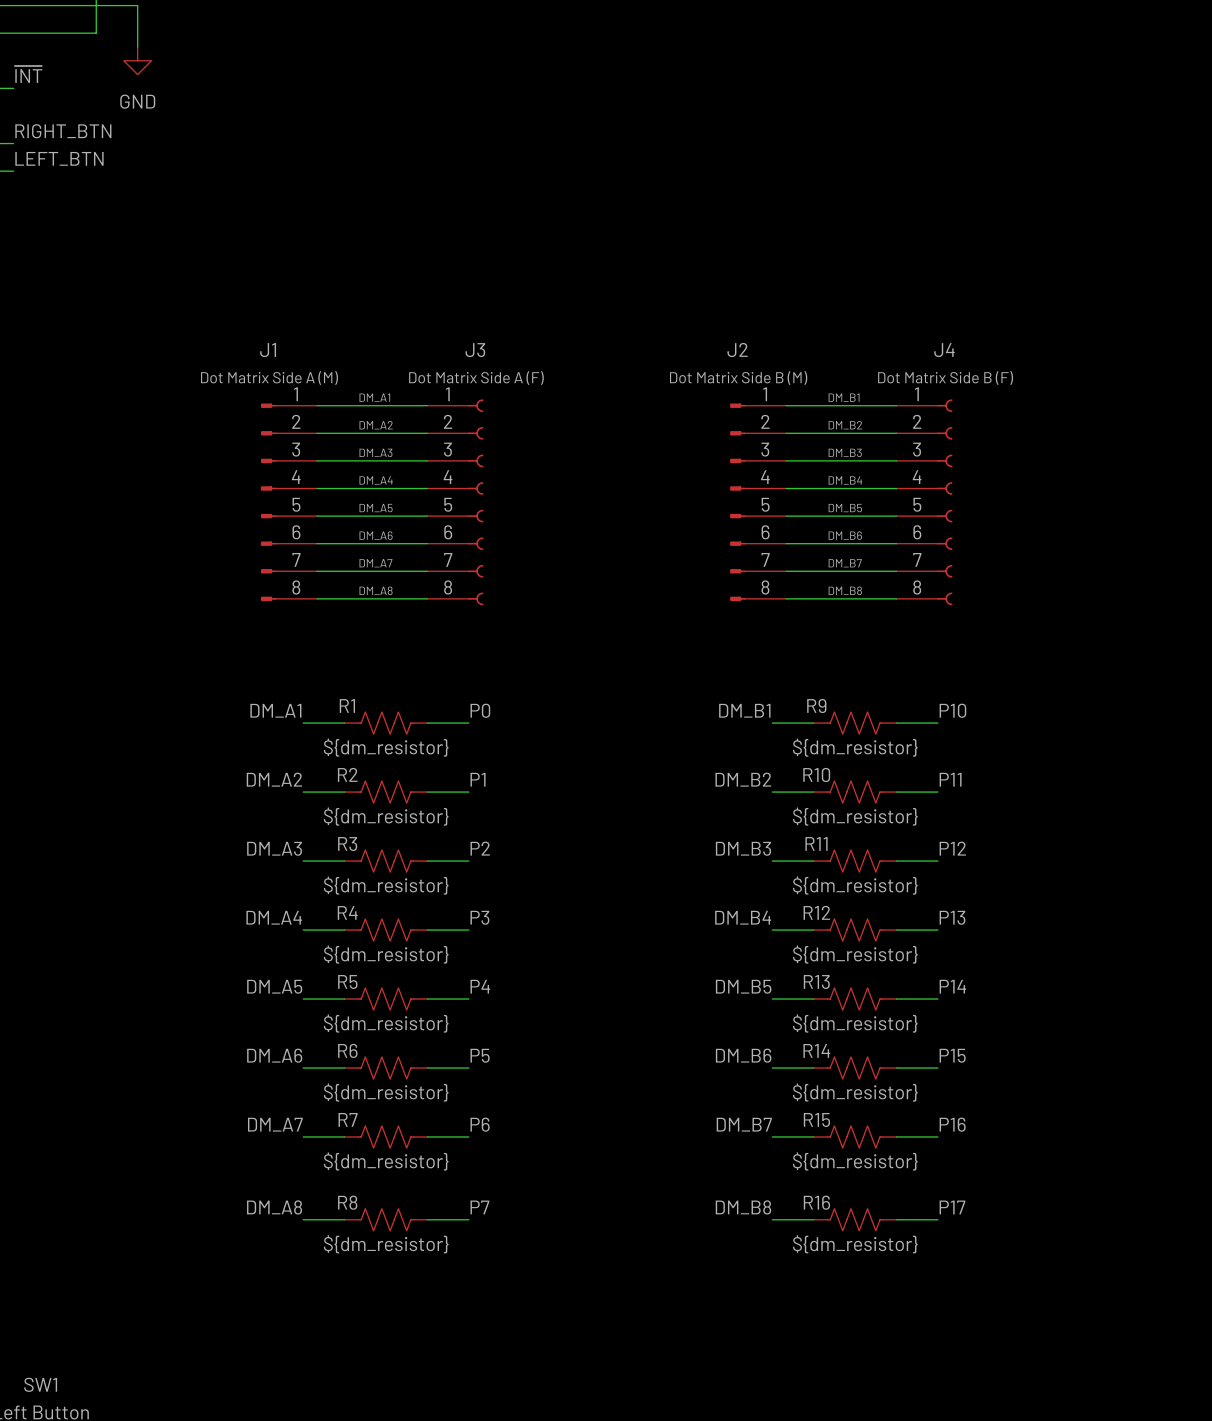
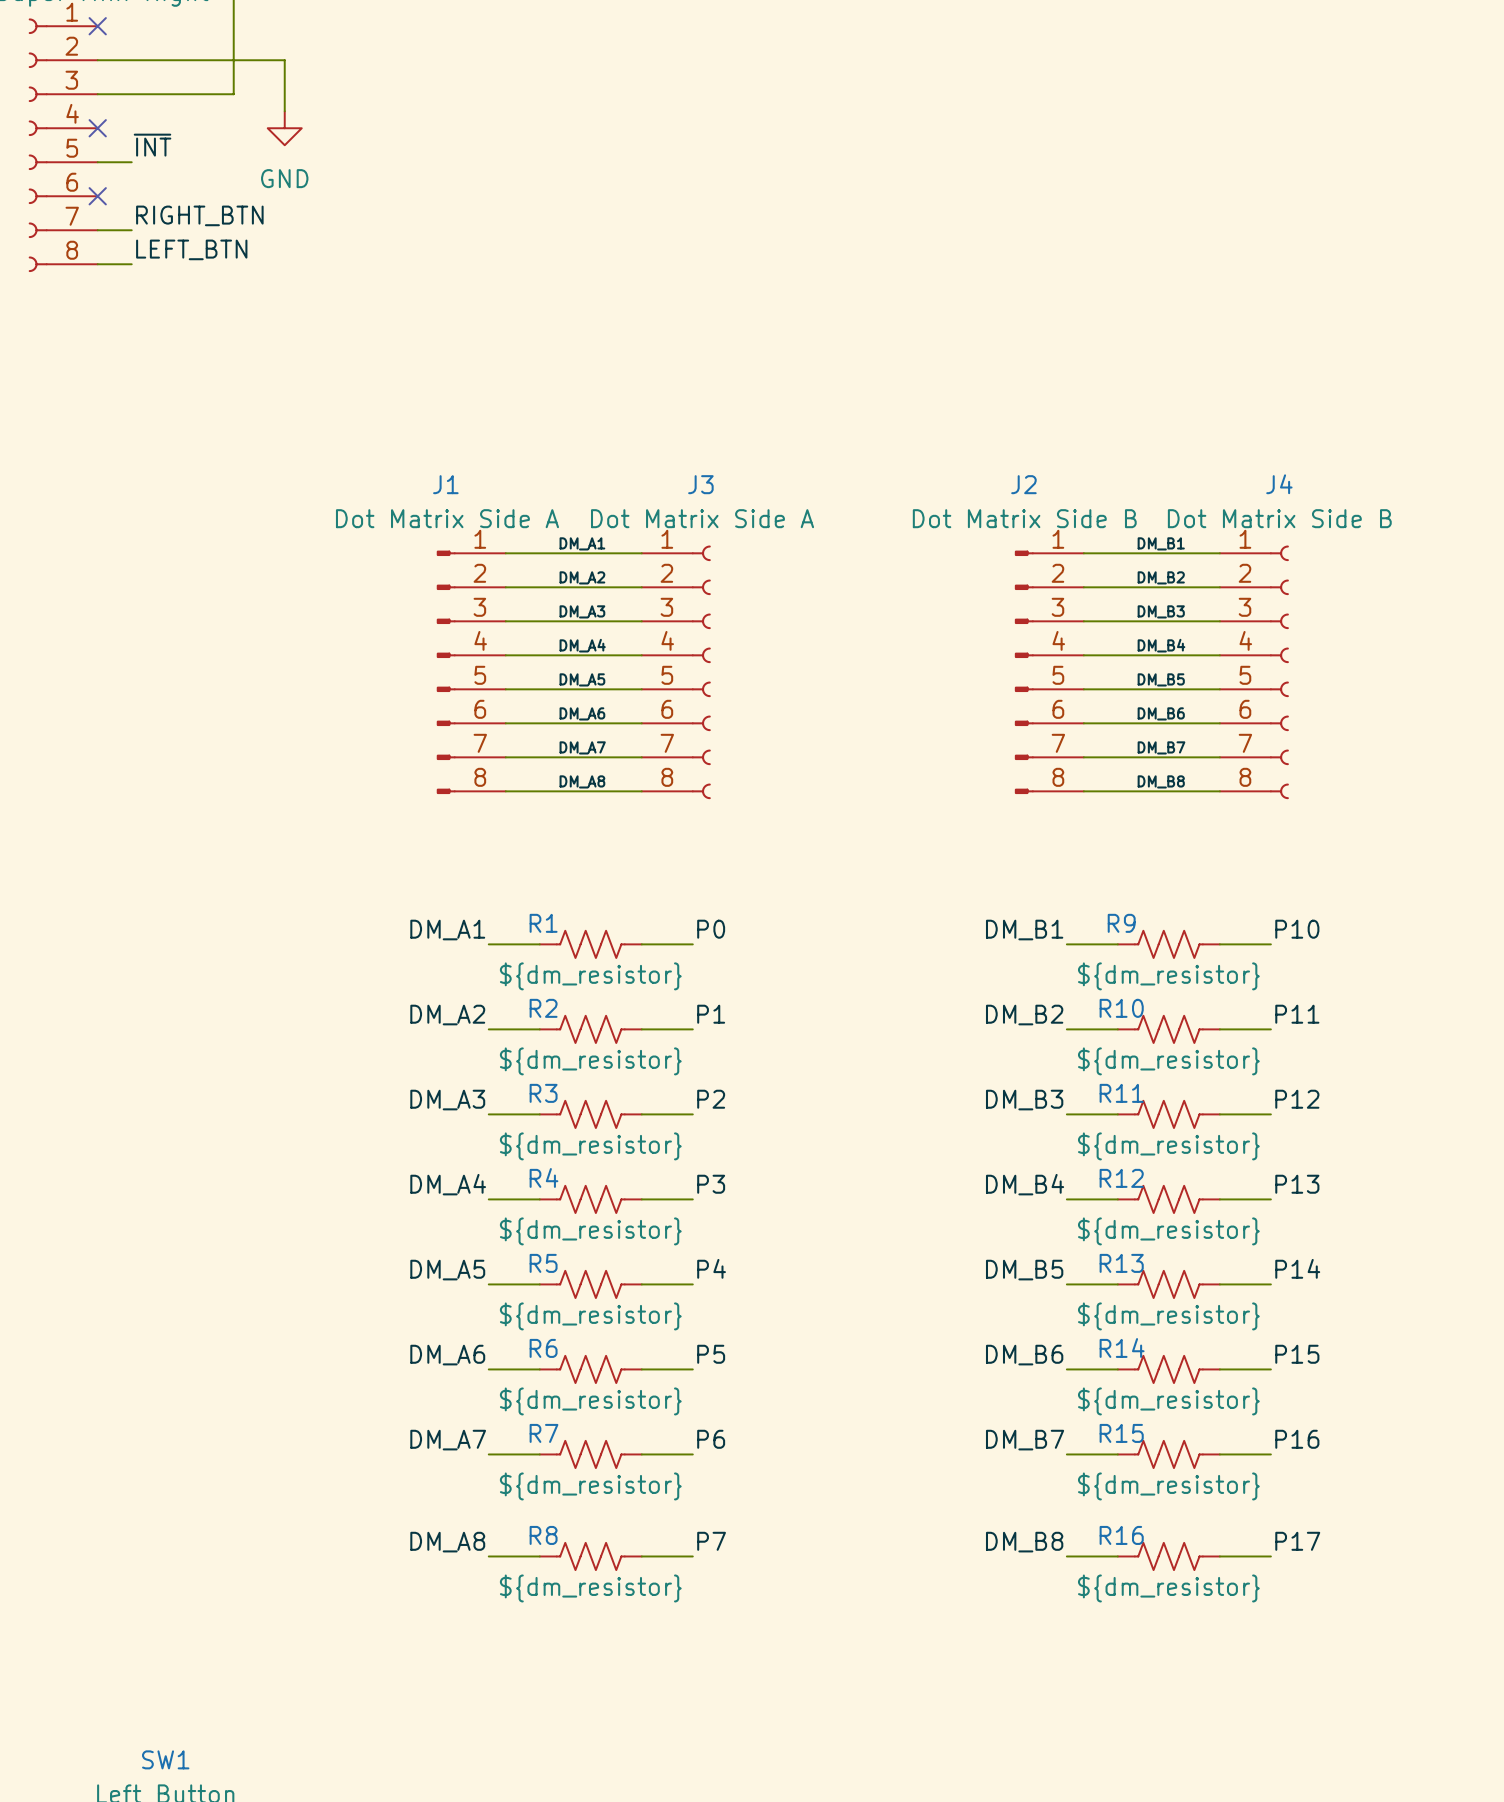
J1 value: Dot Matrix Side A (M) (269, 378) -> Dot Matrix Side A (447, 518)
J3 value: Dot Matrix Side A (F) (476, 378) -> Dot Matrix Side A (702, 518)
J2 value: Dot Matrix Side B (M) (738, 378) -> Dot Matrix Side B (1024, 518)
J4 value: Dot Matrix Side B (F) (945, 378) -> Dot Matrix Side B (1279, 518)

